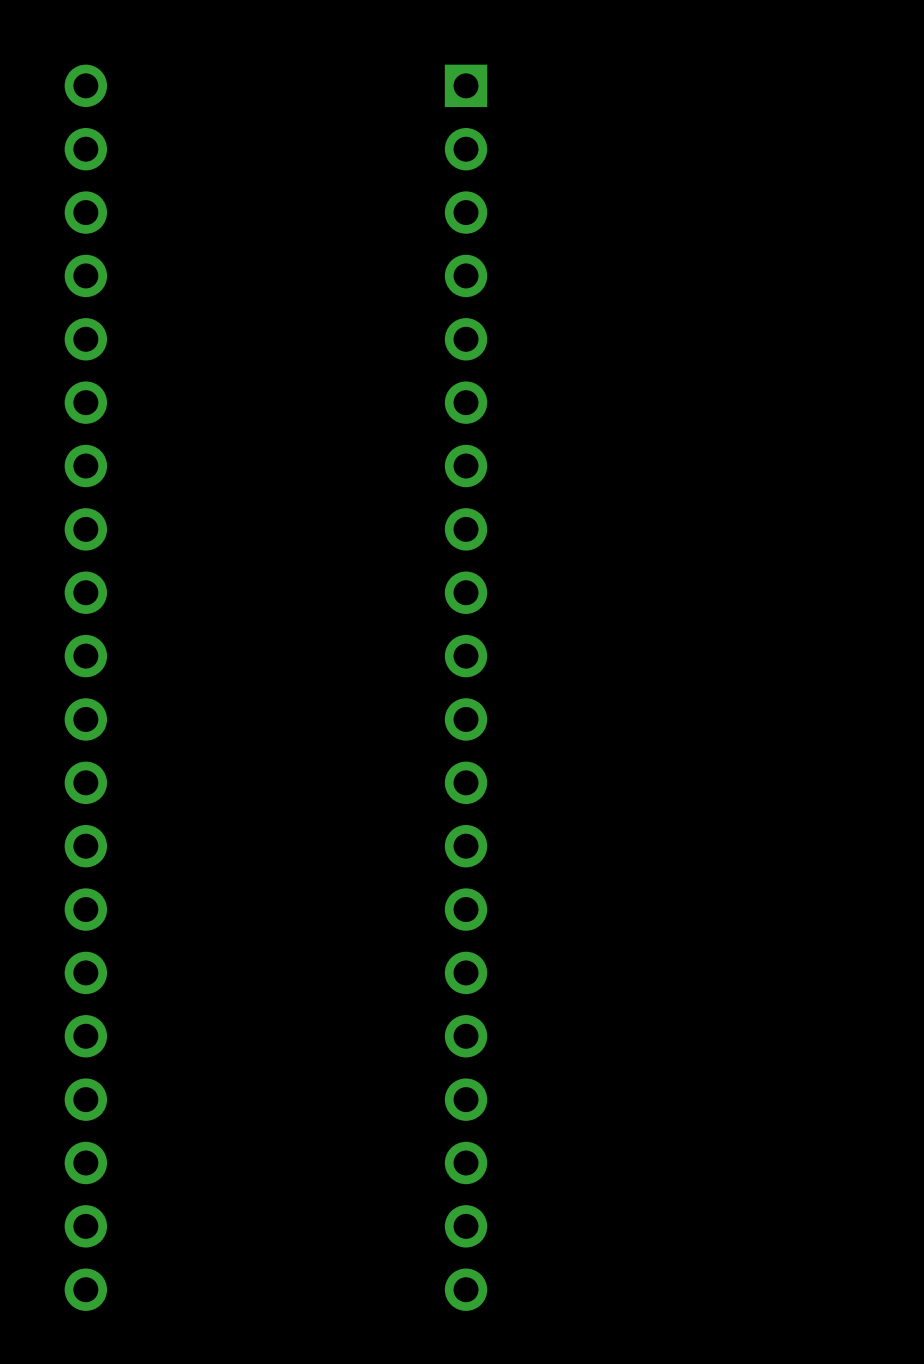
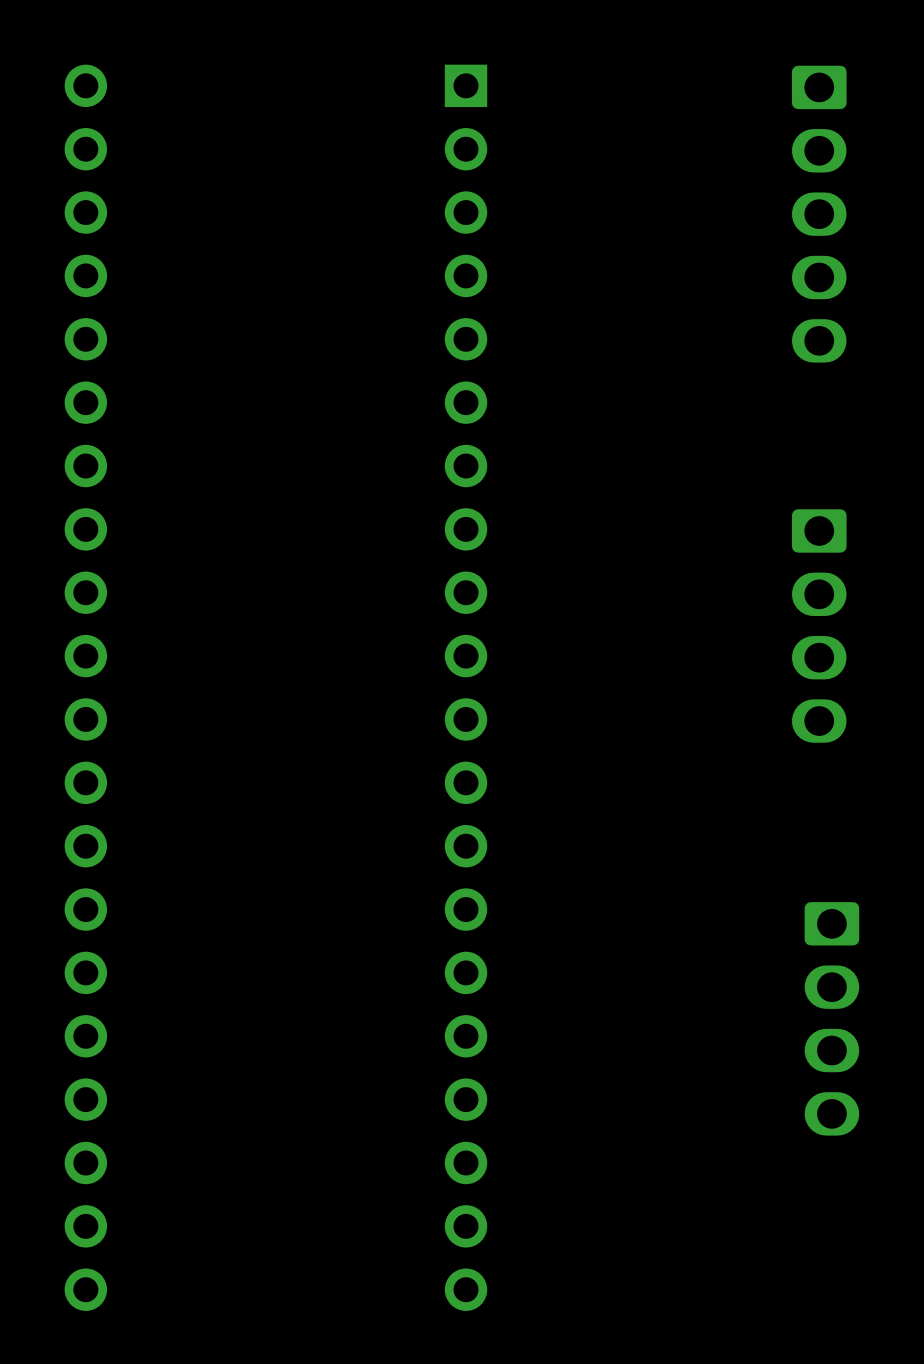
part: none -> (819, 214)
part: none -> (819, 626)
part: none -> (831, 1018)

